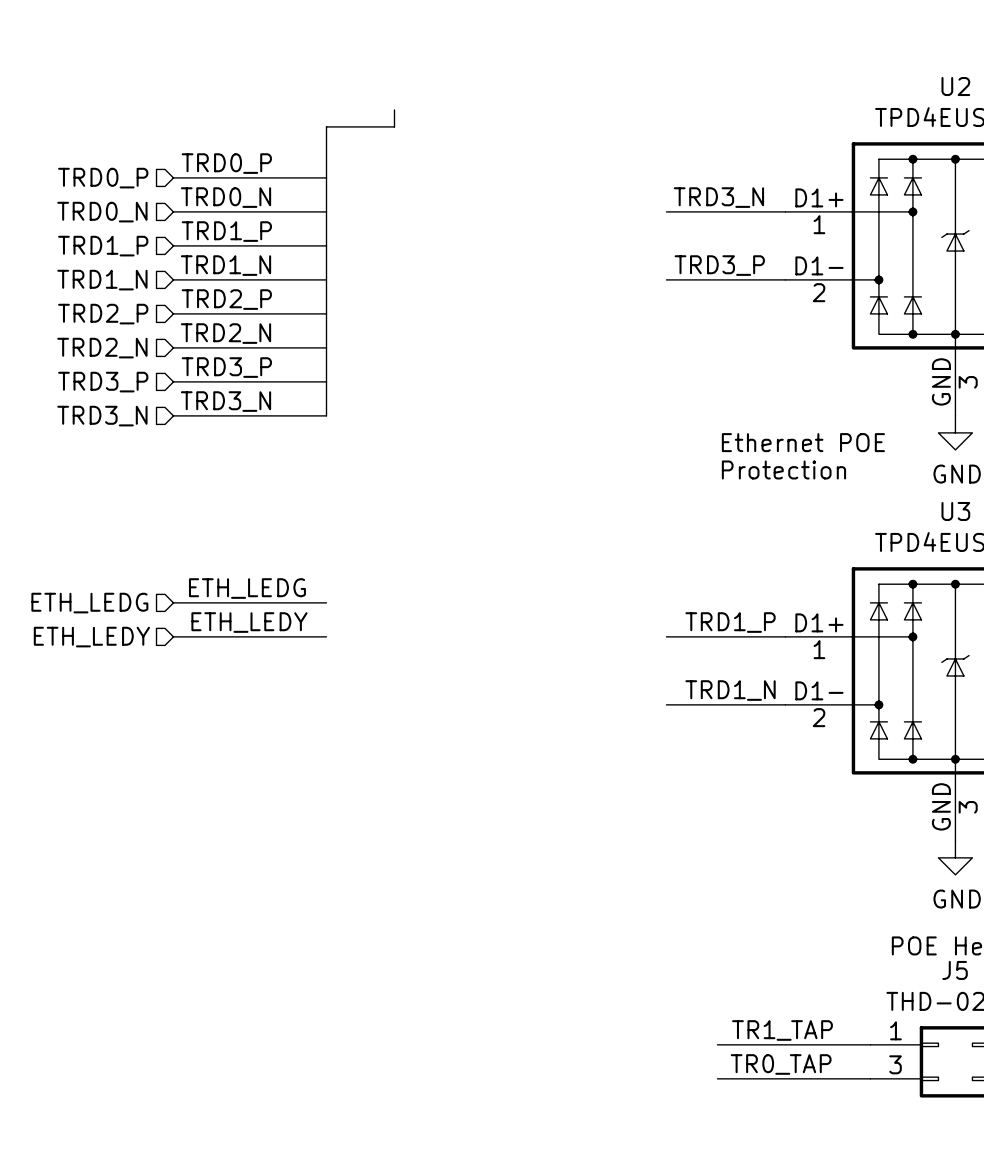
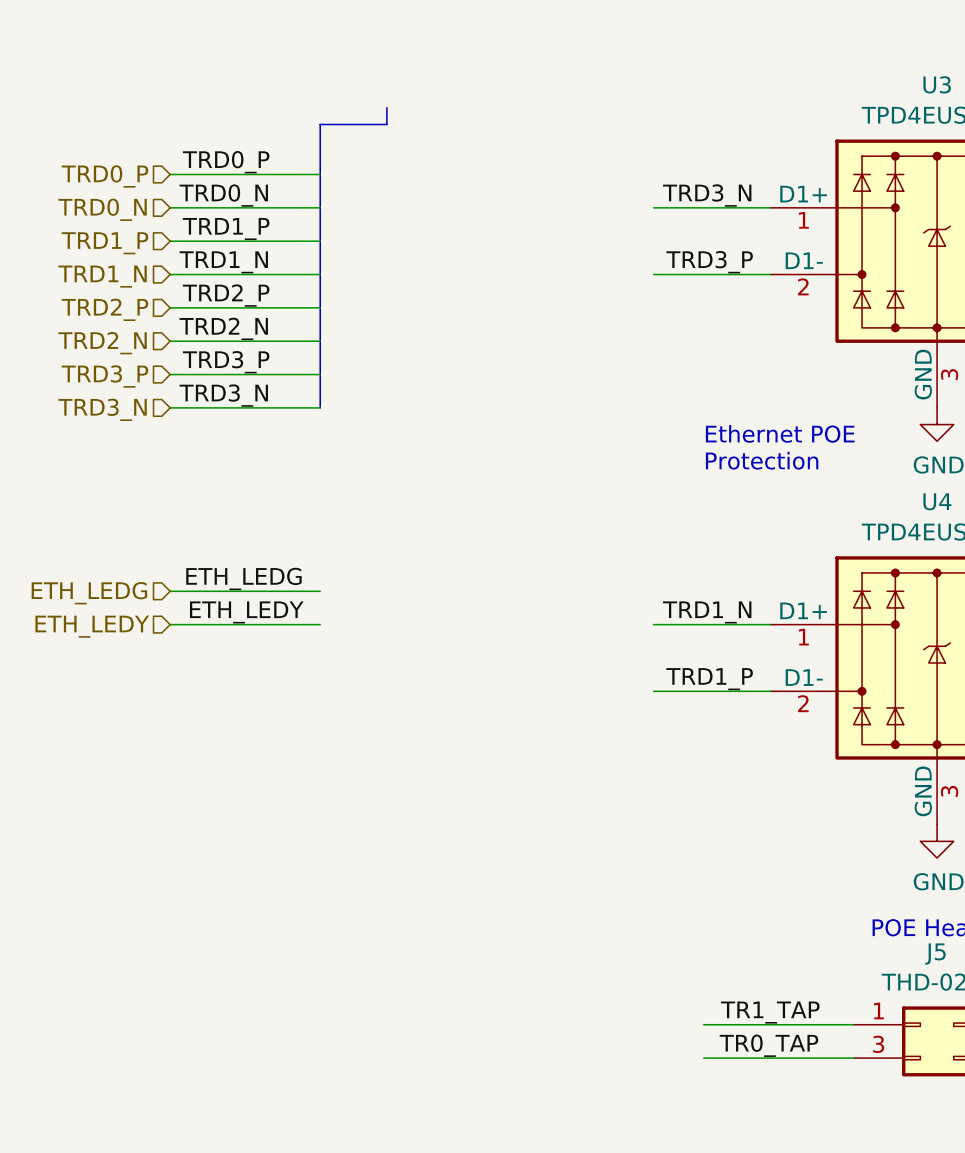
U2 name: U2 (955, 86) -> U3 (937, 84)
U3 name: U3 (955, 511) -> U4 (937, 501)
label position: TRD1_P (730, 622) -> TRD1_P (709, 679)
label position: TRD1_N (730, 690) -> TRD1_N (707, 612)

